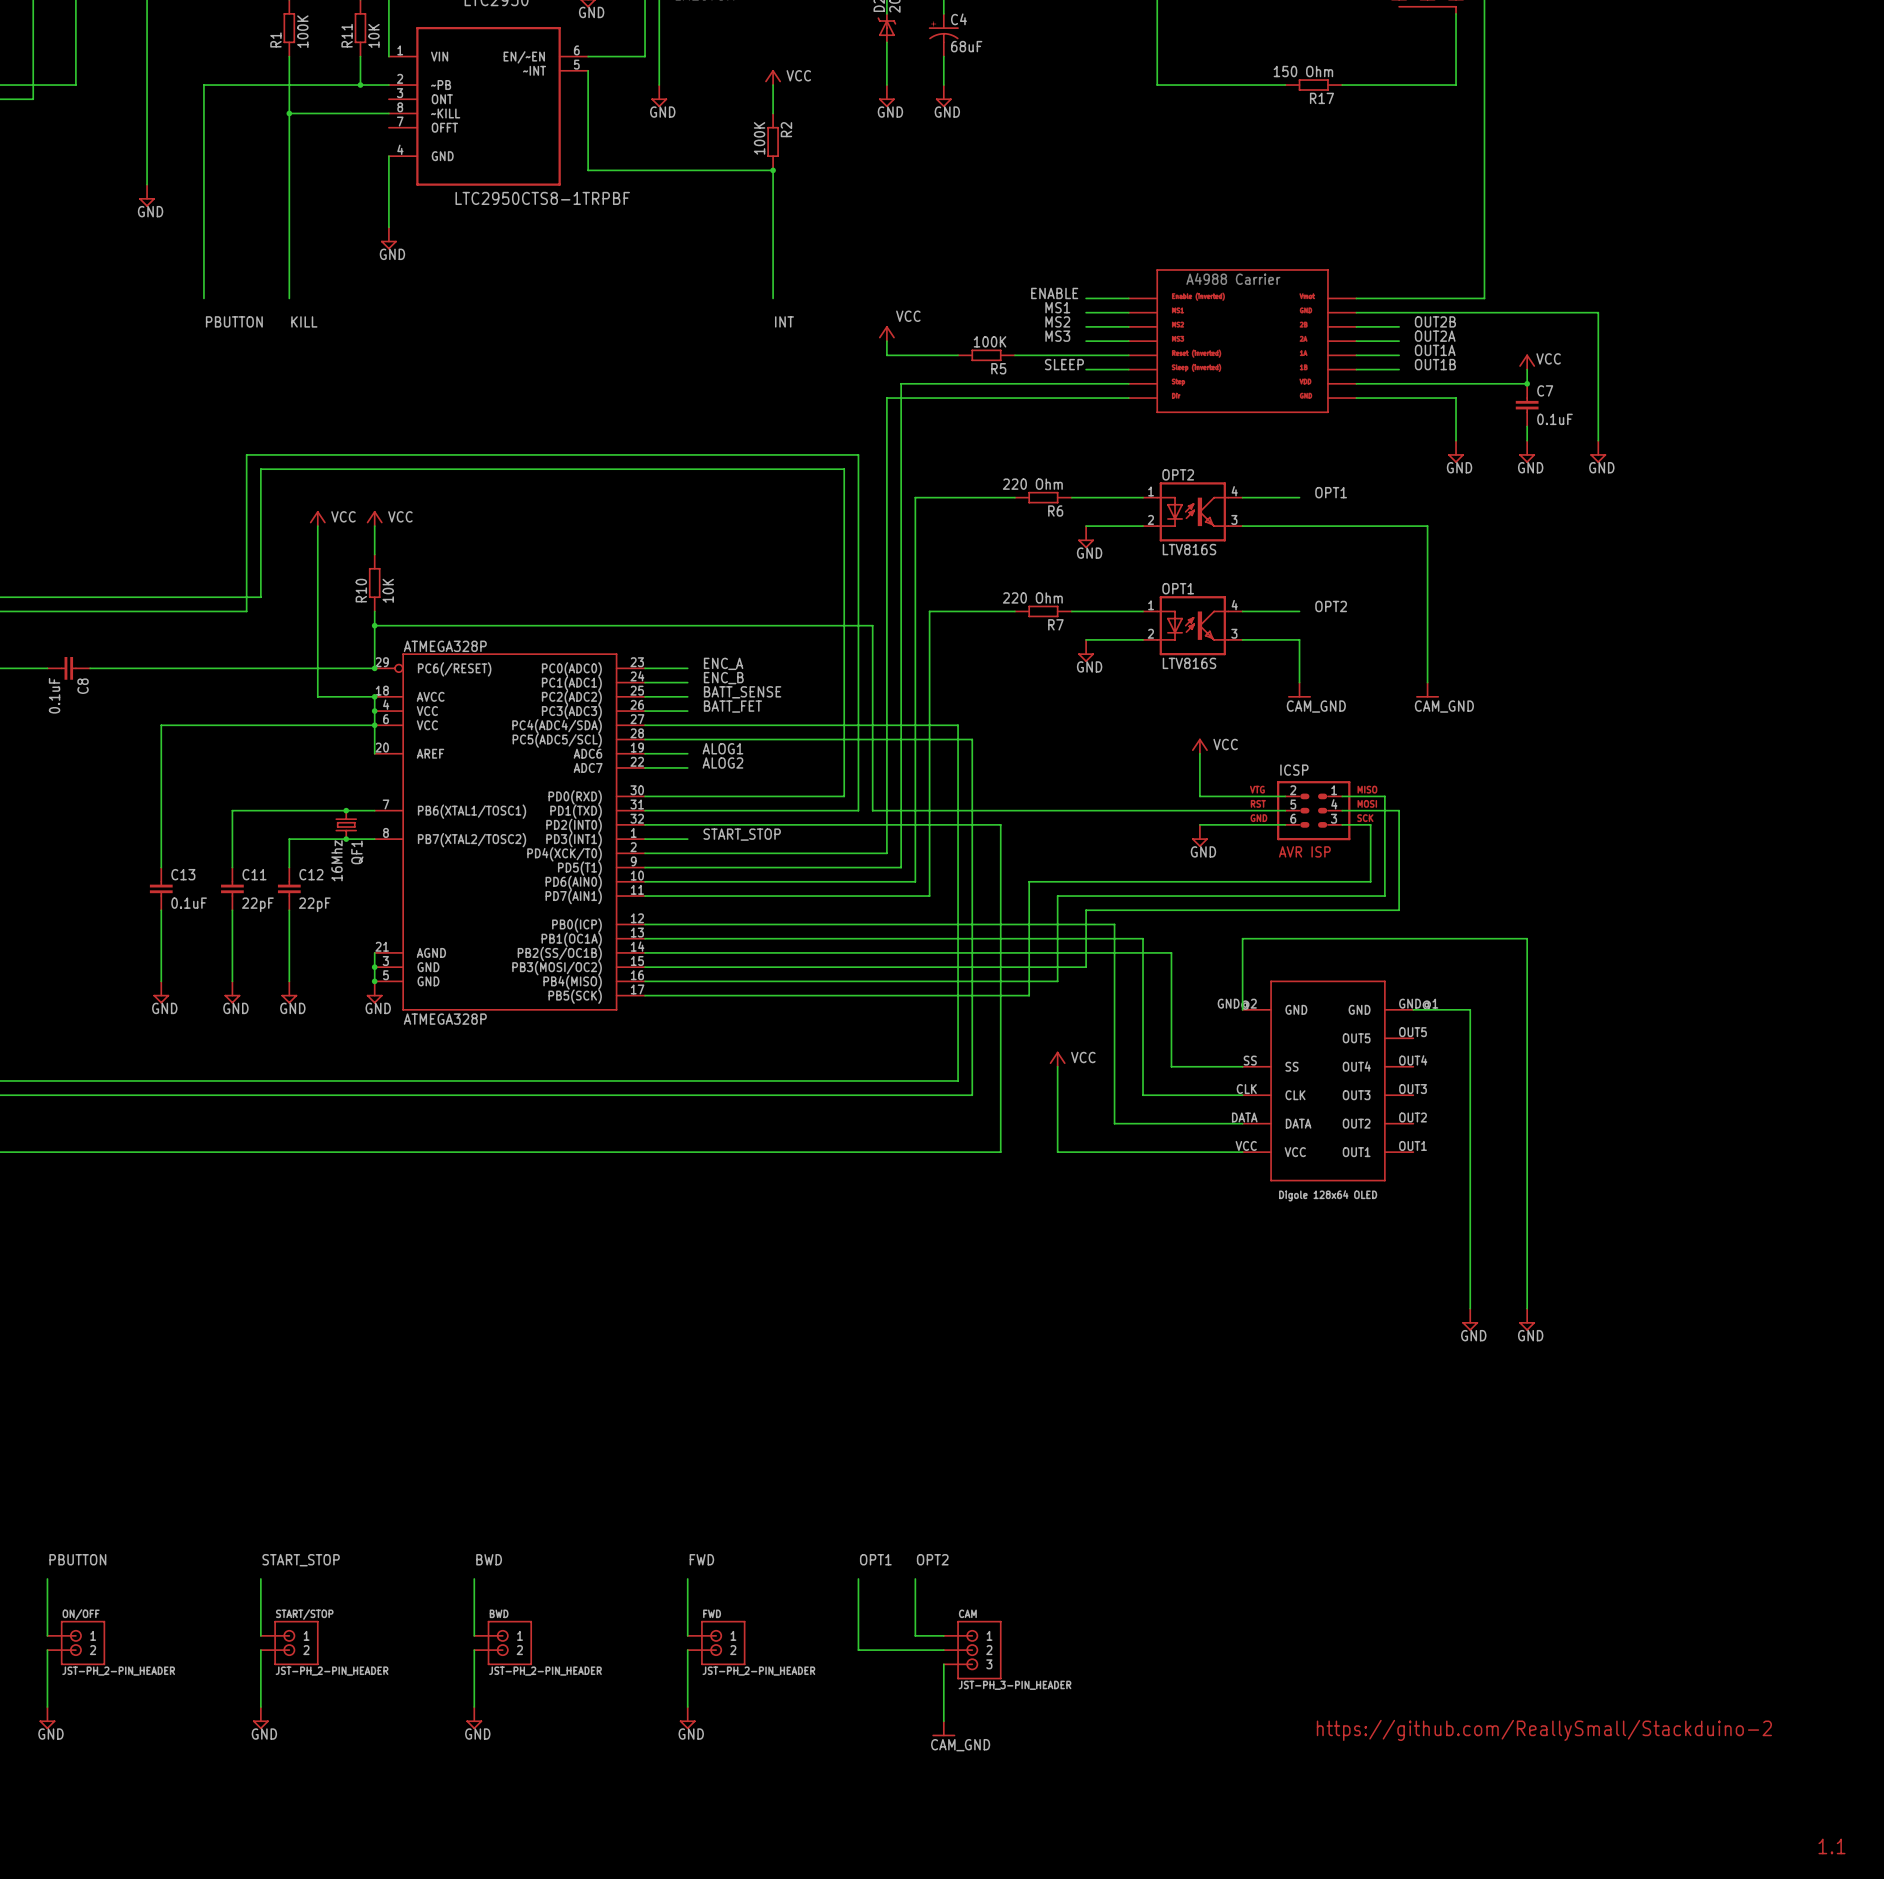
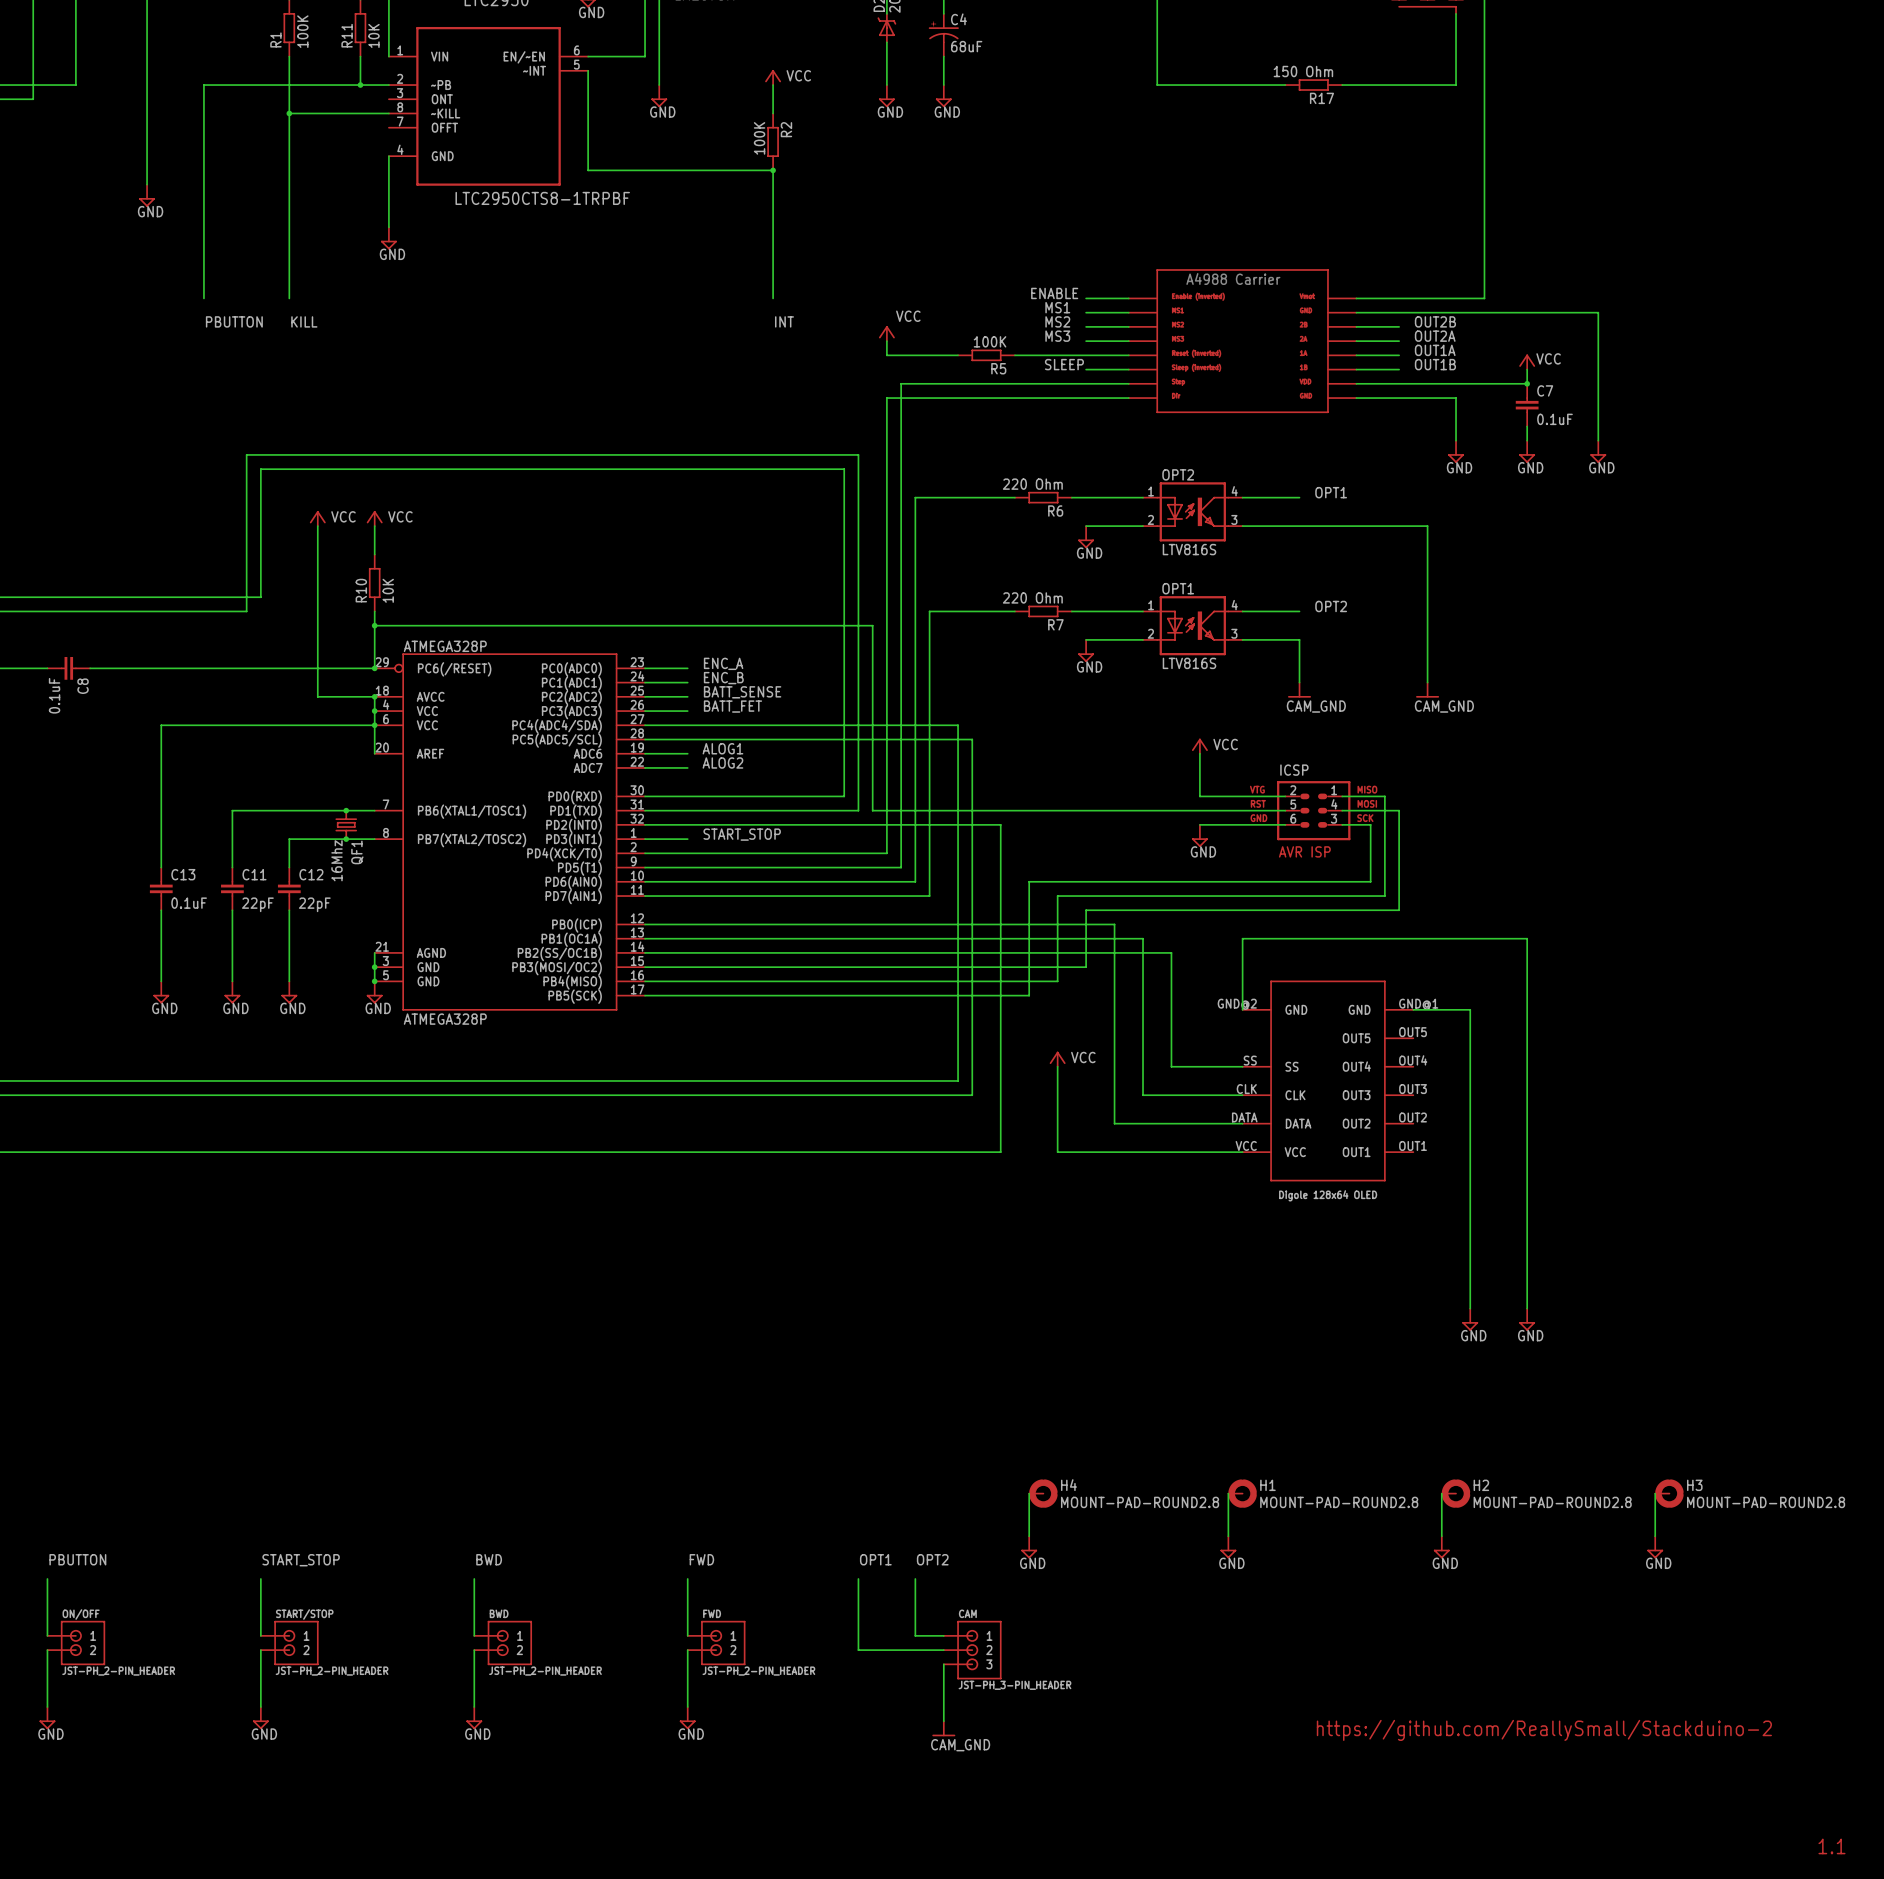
wire: none -> (1029, 1493) (1029, 1536)
H4: none -> MOUNT-PAD-ROUND2.8 (1043, 1493)
wire: none -> (1228, 1493) (1228, 1536)
H1: none -> MOUNT-PAD-ROUND2.8 (1242, 1493)
wire: none -> (1441, 1493) (1441, 1536)
H2: none -> MOUNT-PAD-ROUND2.8 (1456, 1493)
wire: none -> (1655, 1493) (1655, 1536)
H3: none -> MOUNT-PAD-ROUND2.8 (1669, 1493)
power symbol: none -> GND (1029, 1547)
power symbol: none -> GND (1228, 1547)
power symbol: none -> GND (1441, 1547)
power symbol: none -> GND (1655, 1547)

